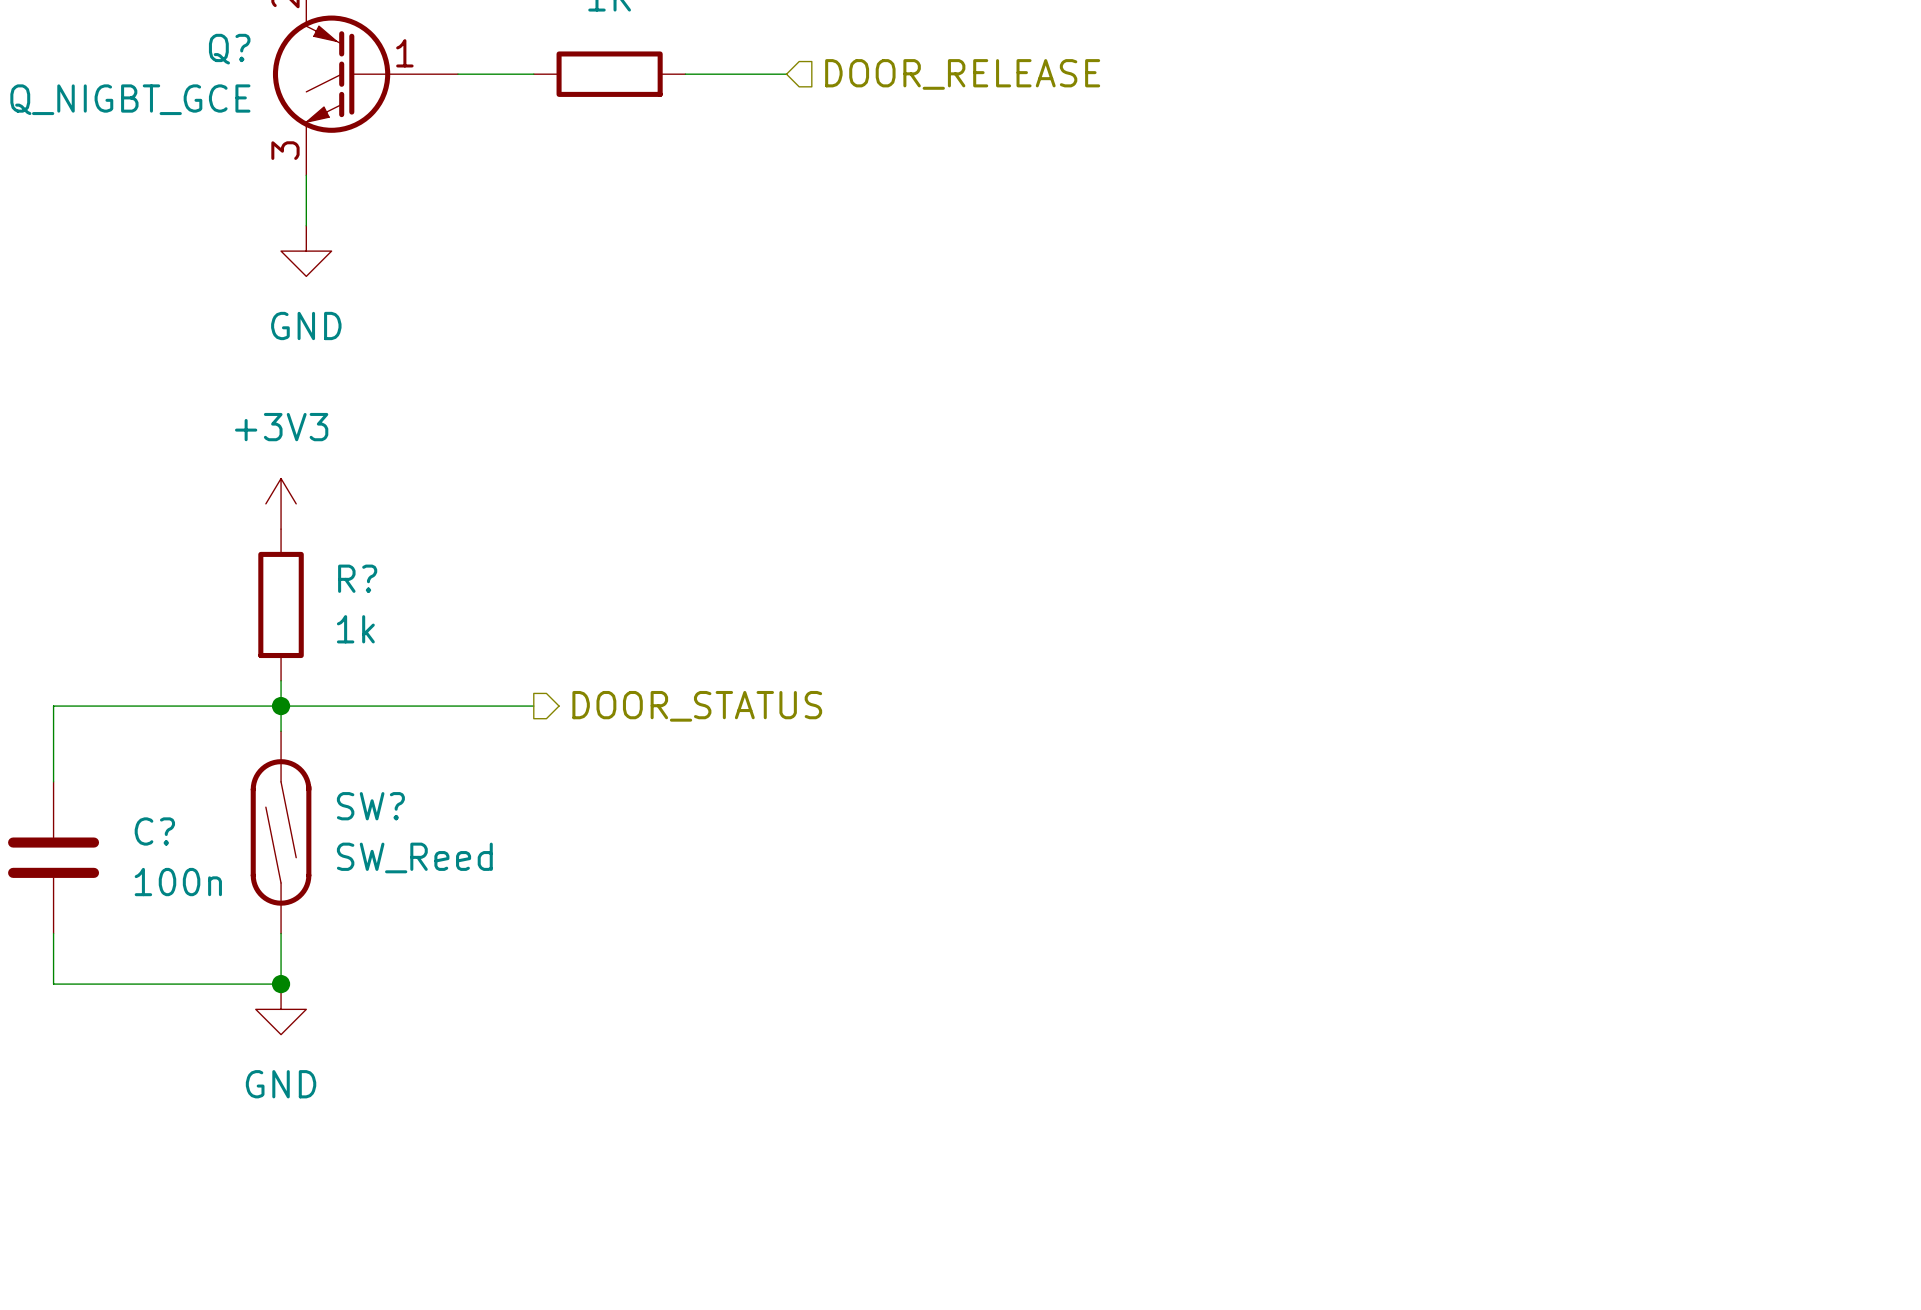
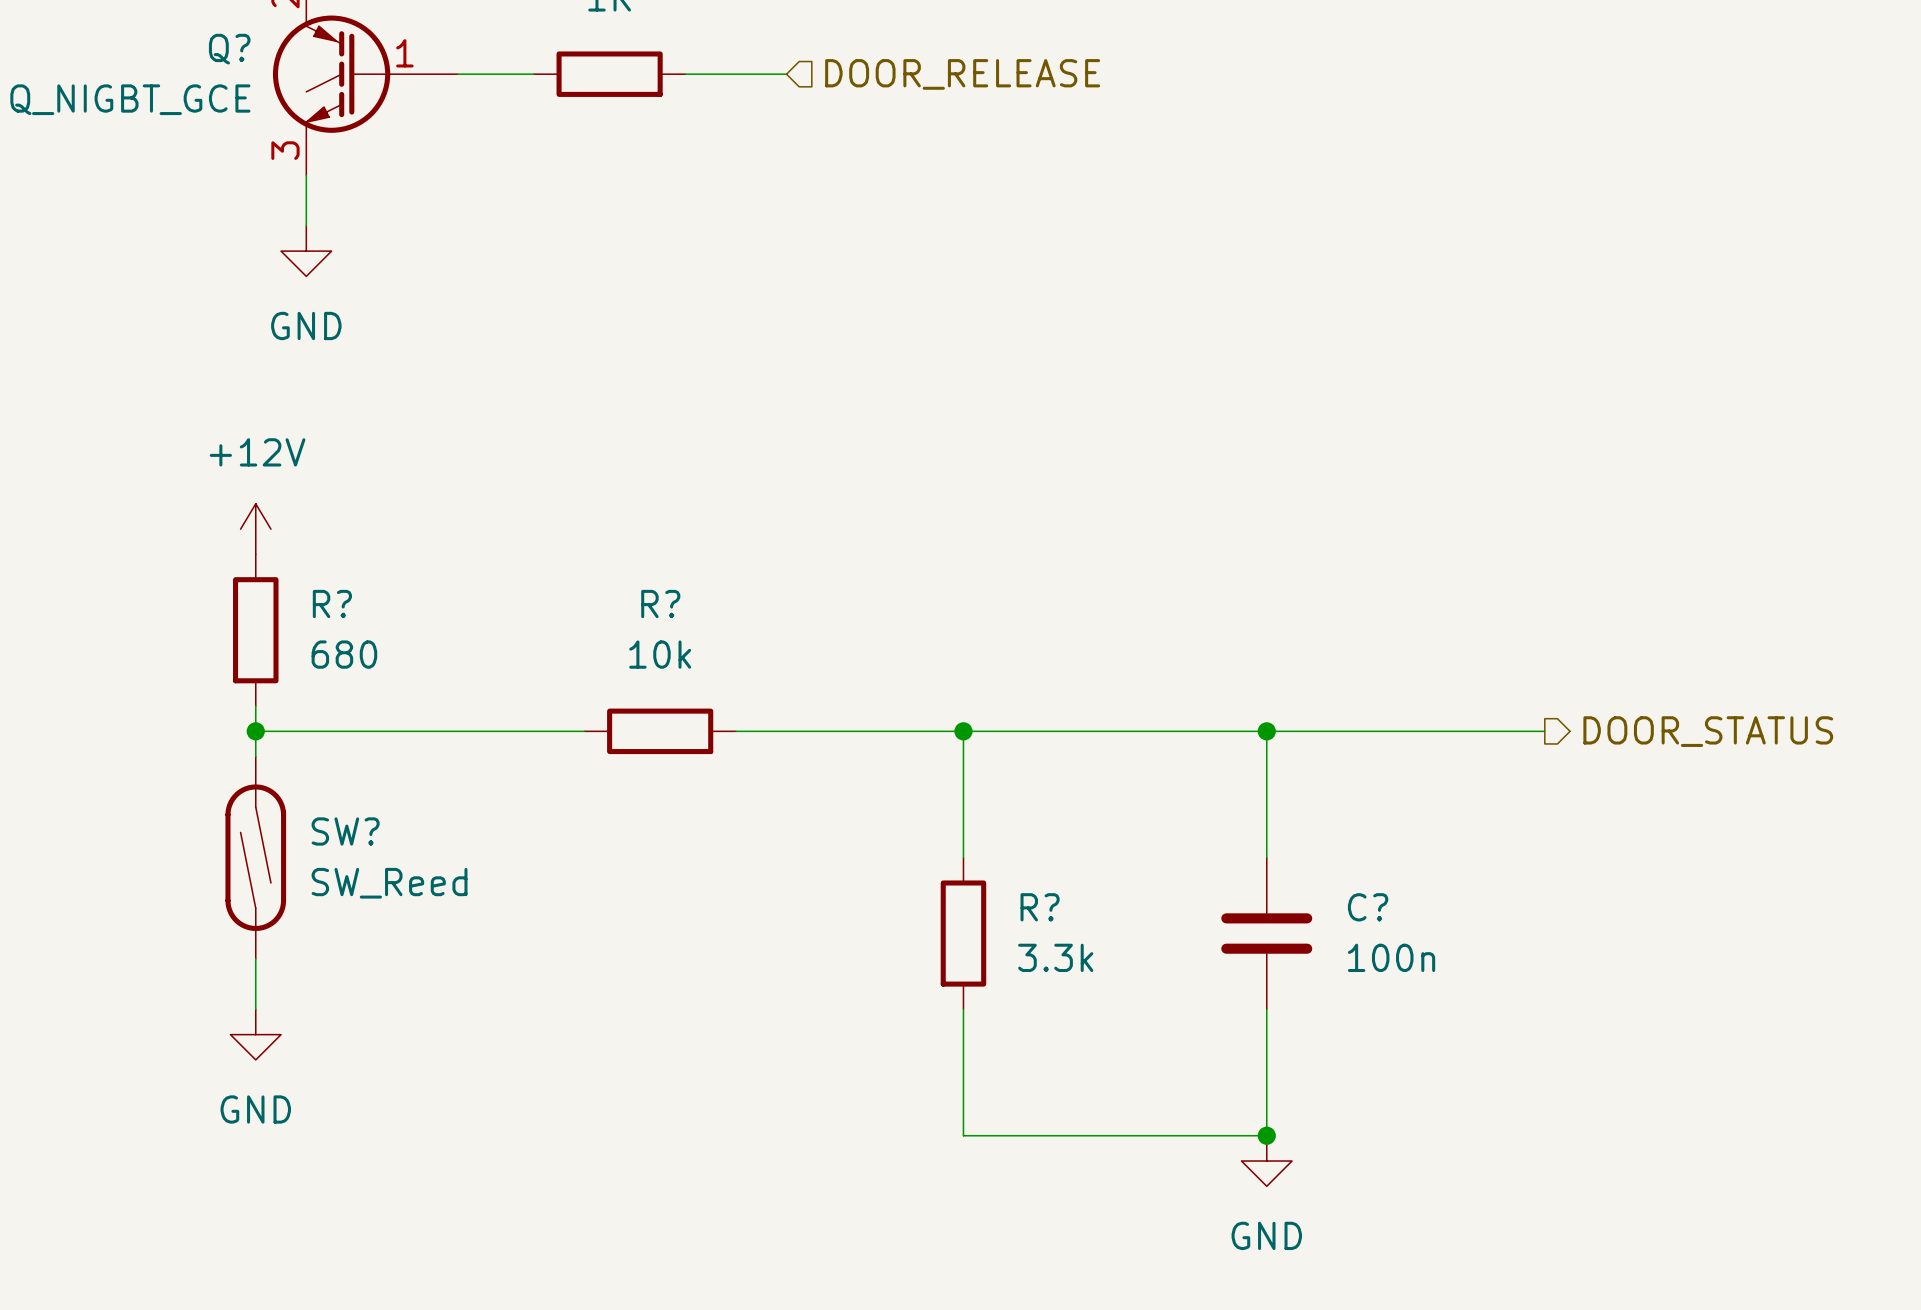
power symbol: +3V3 (281, 503) -> none
power symbol: none -> +12V (255, 529)
R?: 1k (281, 604) -> none
R?: none -> 680 (255, 630)
wire: (281, 680) (281, 731) -> (255, 706) (255, 756)
junction position: (281, 706) -> (255, 731)
wire: (533, 706) (53, 706) (53, 781) -> none
hierarchical label: DOOR_STATUS (697, 706) -> none
wire: none -> (255, 731) (584, 731)
R?: none -> 10k (660, 731)
wire: none -> (735, 731) (1544, 731)
wire: none -> (963, 731) (963, 857)
junction: none -> (963, 731)
wire: none -> (1266, 731) (1266, 857)
junction: none -> (1266, 731)
hierarchical label: none -> DOOR_STATUS (1708, 731)
SW? position: (281, 832) -> (255, 857)
C?: 100n (53, 857) -> none
wire: (53, 933) (53, 984) (281, 984) (281, 933) -> none
R?: none -> 3.3k (963, 933)
C?: none -> 100n (1266, 933)
wire: none -> (255, 958) (255, 1009)
junction: (281, 984) -> none
power symbol position: GND (281, 1009) -> GND (255, 1034)
wire: none -> (963, 1009) (963, 1135) (1266, 1135) (1266, 1009)
junction: none -> (1266, 1135)
power symbol: none -> GND (1266, 1161)

